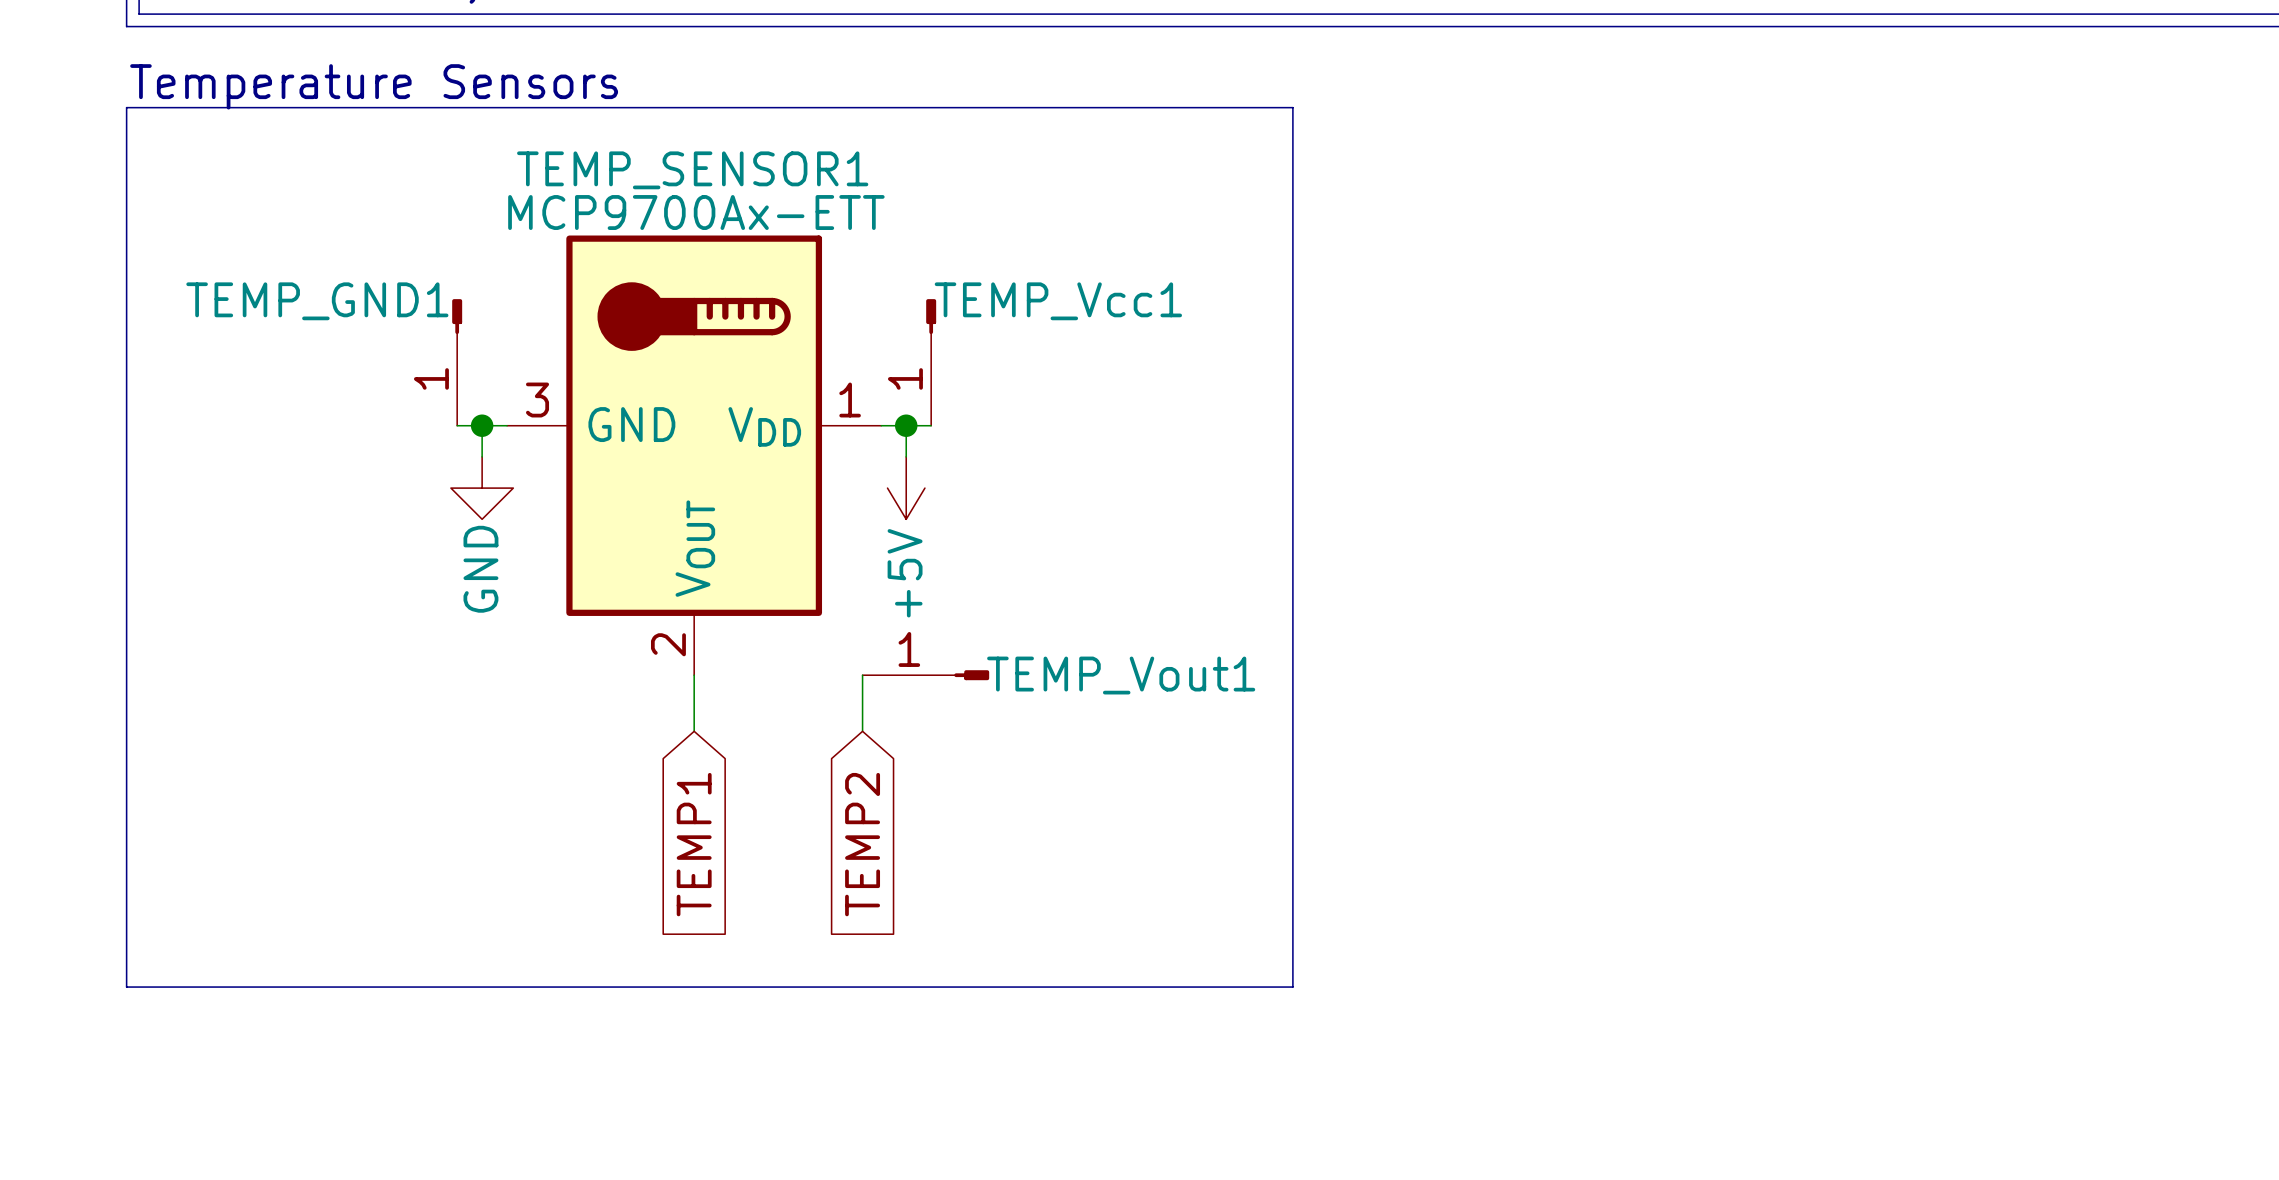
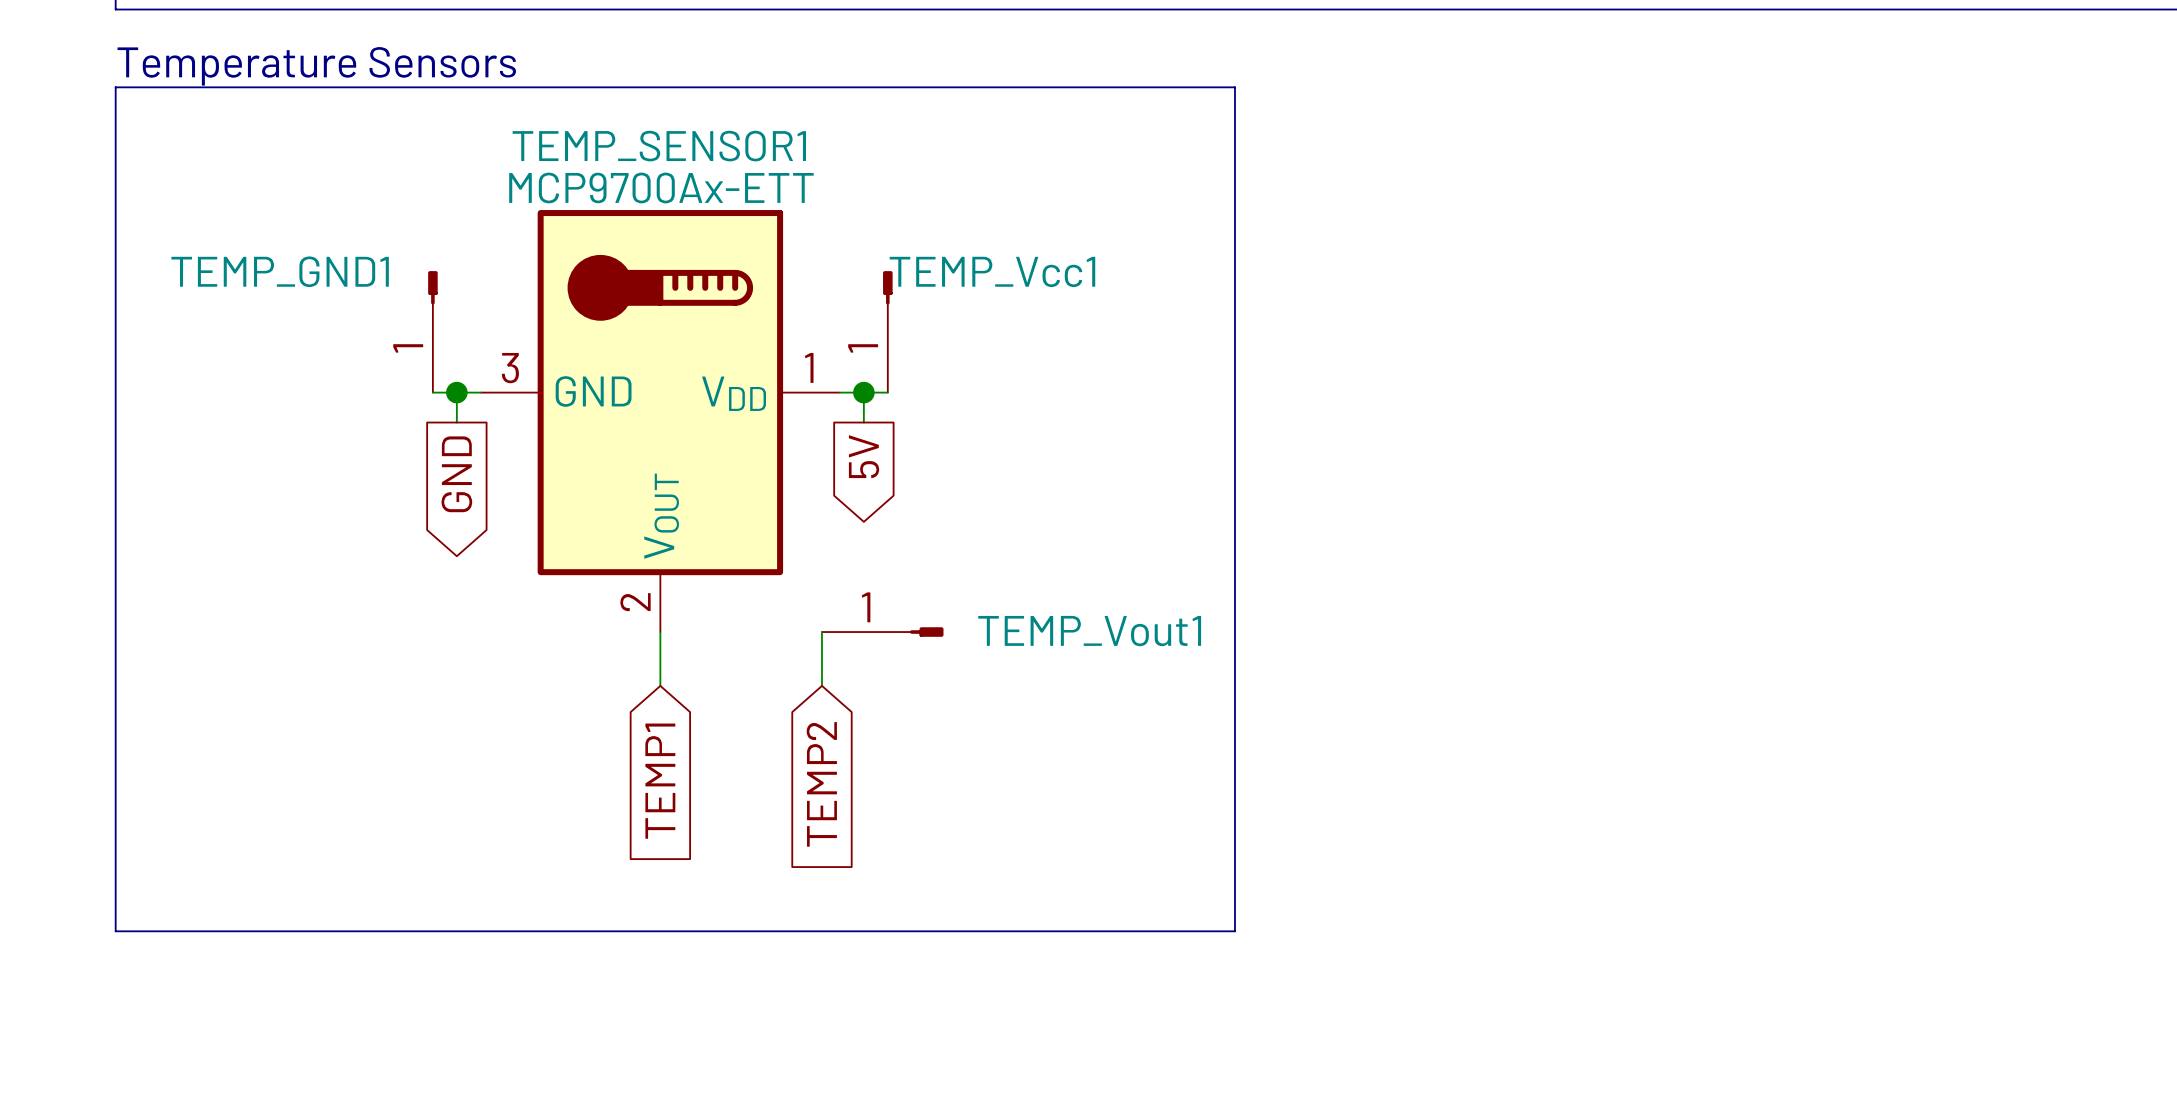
power symbol: GND (482, 488) -> none
power symbol: +5V (906, 488) -> none
global label: none -> 5V (864, 456)
global label: none -> GND (456, 474)

